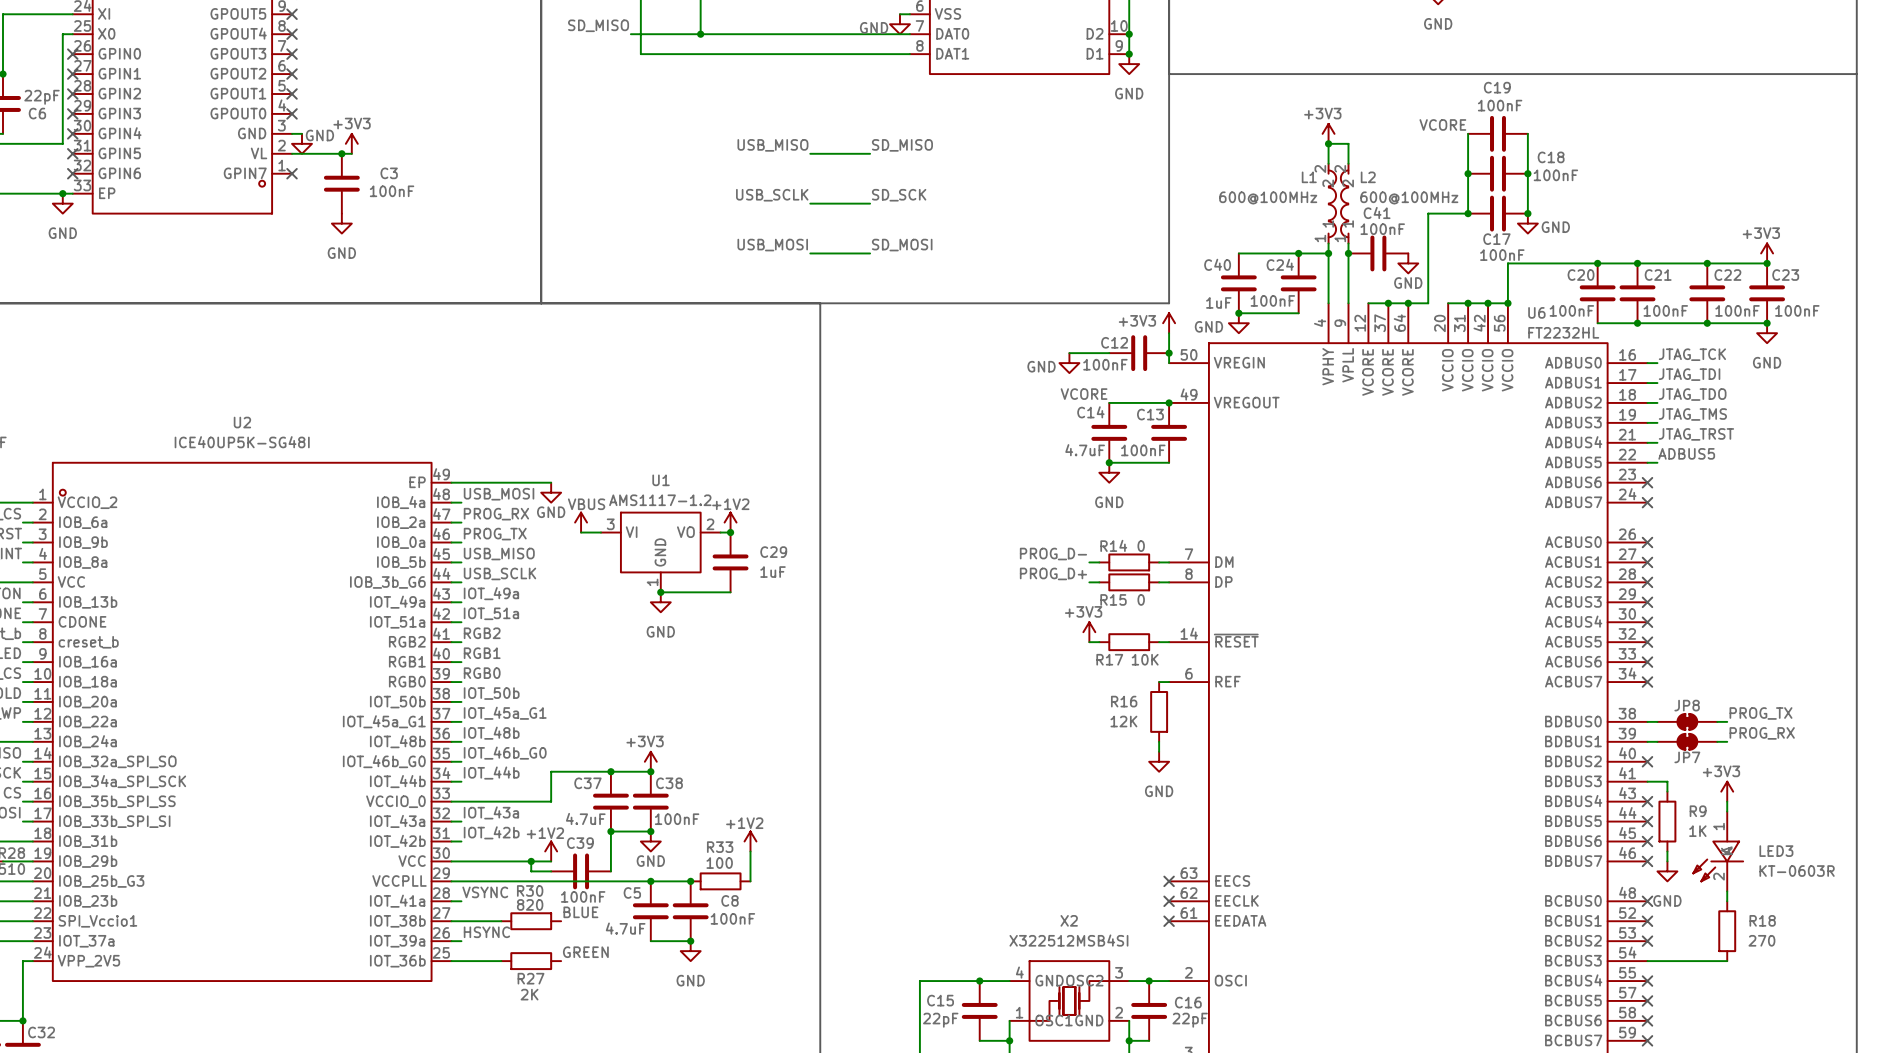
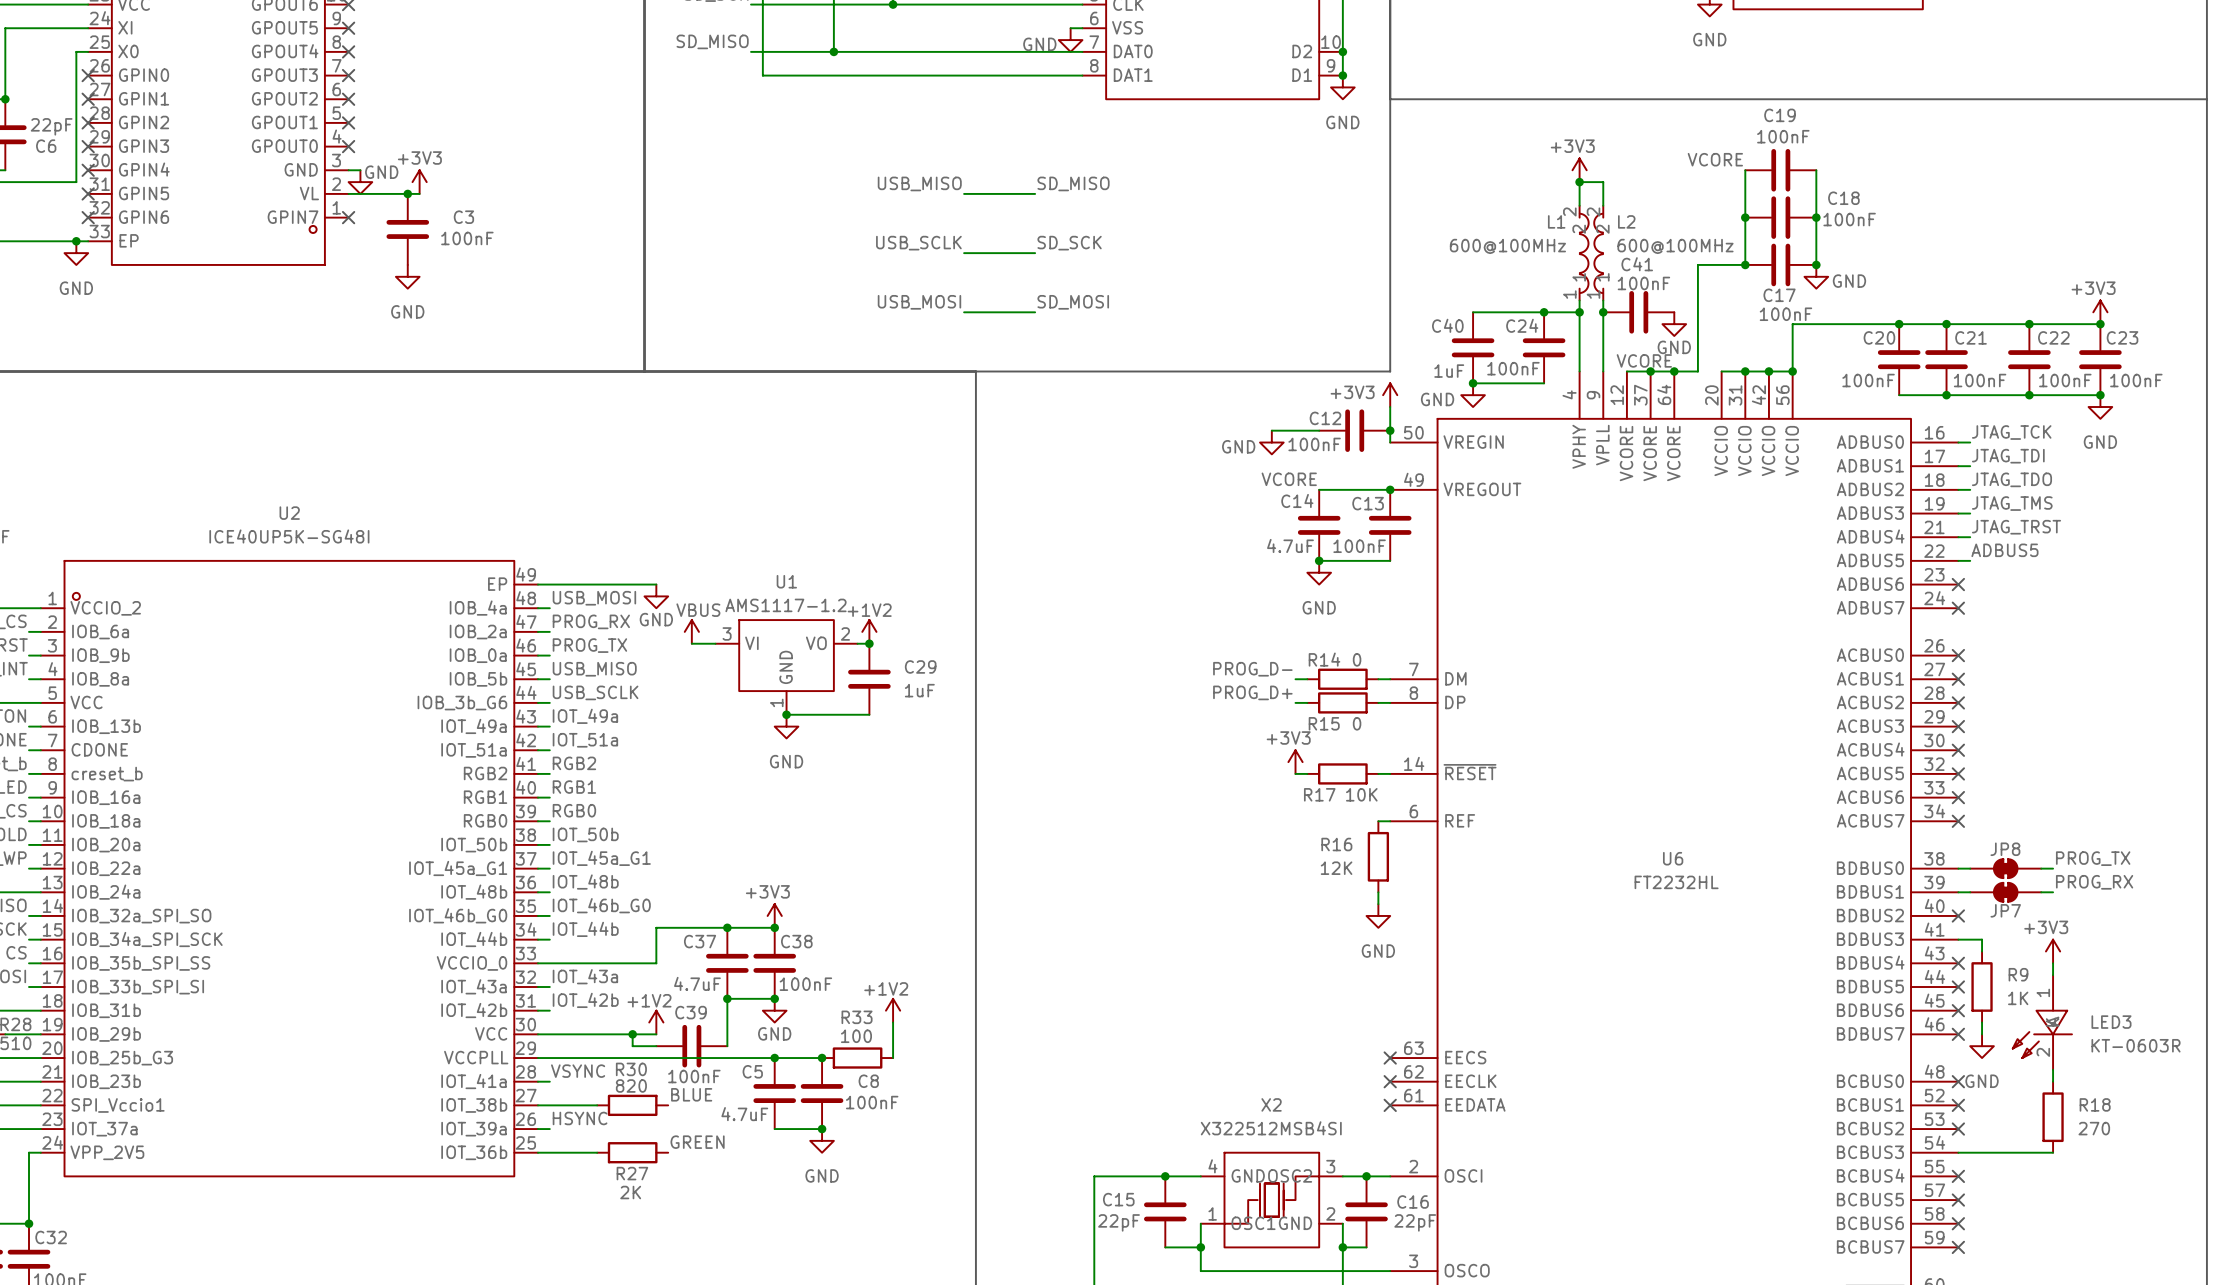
label: none -> VCORE (1644, 360)
U6 name position: U6 (1536, 312) -> U6 (1673, 858)
U6 value position: FT2232HL (1563, 332) -> FT2232HL (1676, 882)

